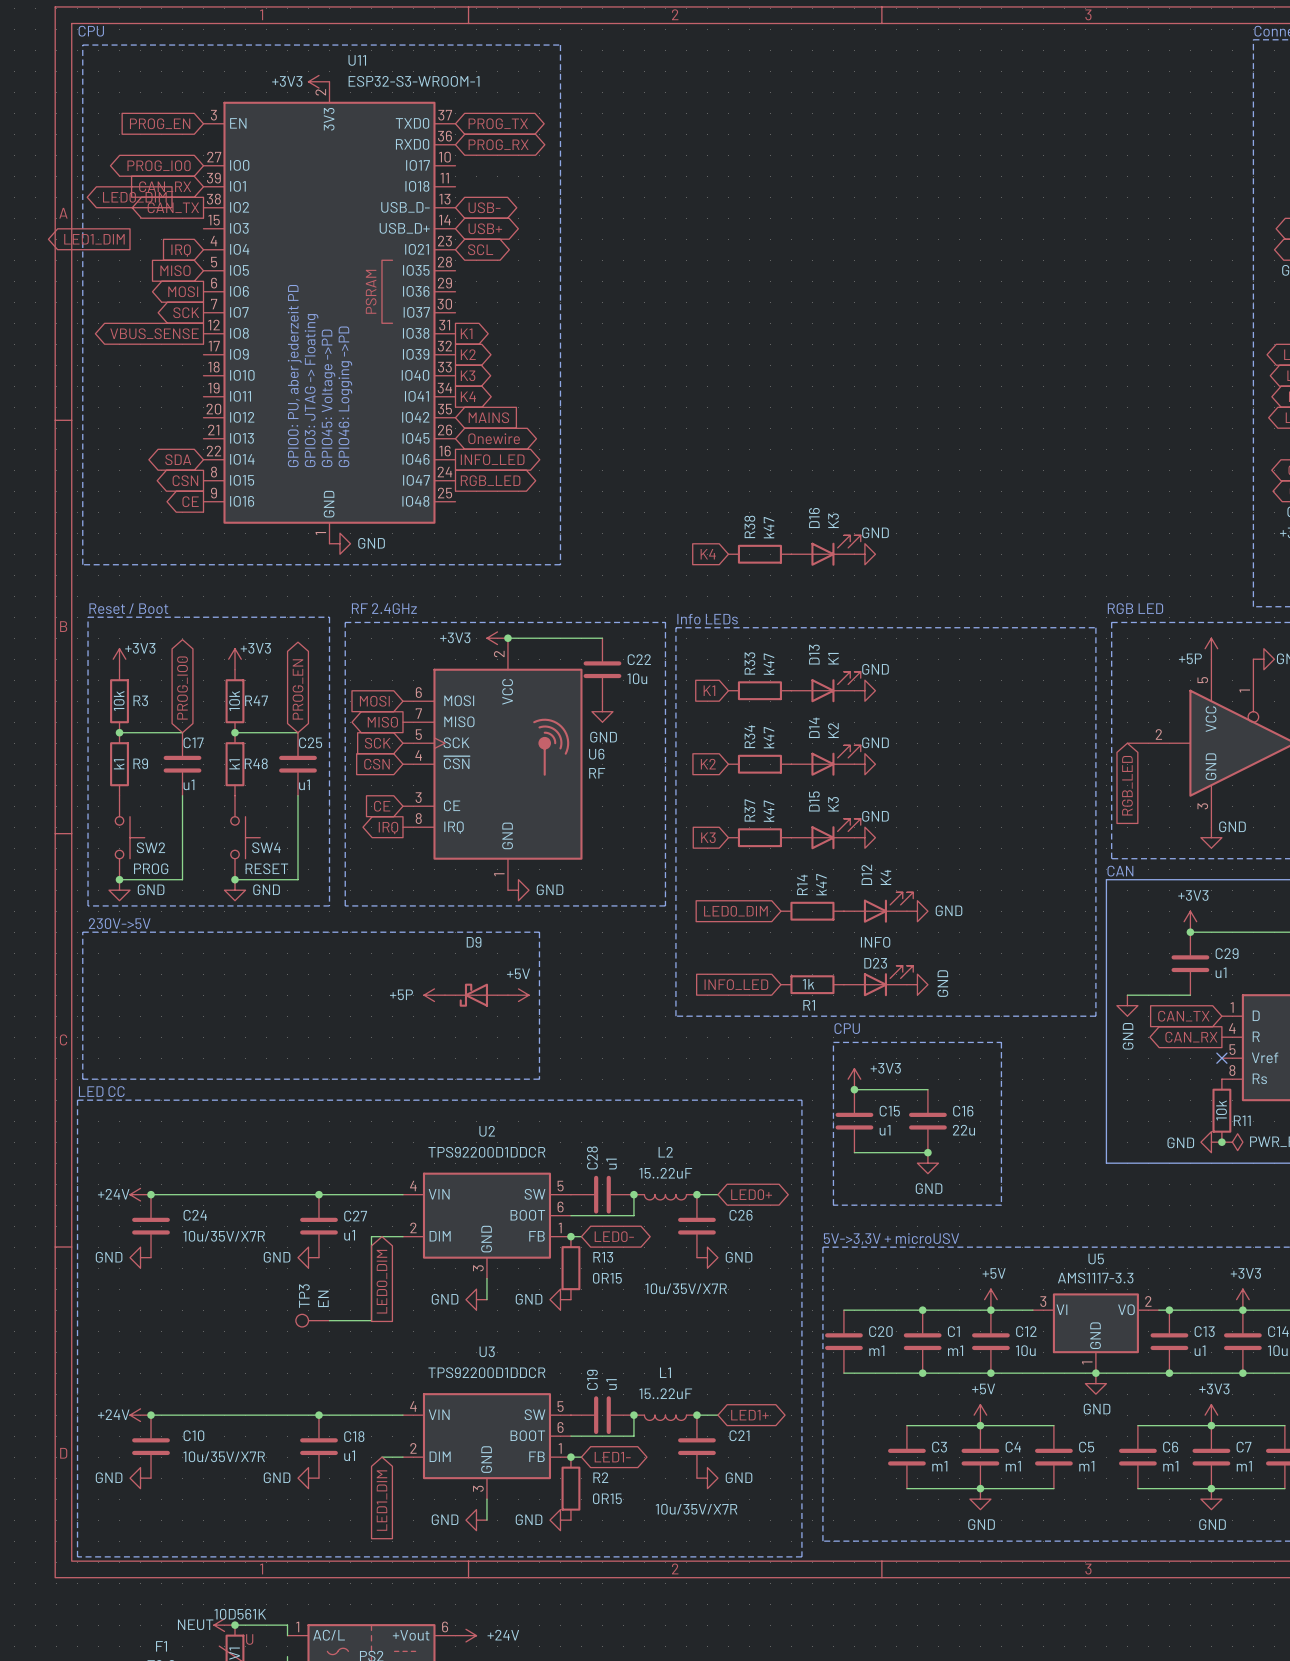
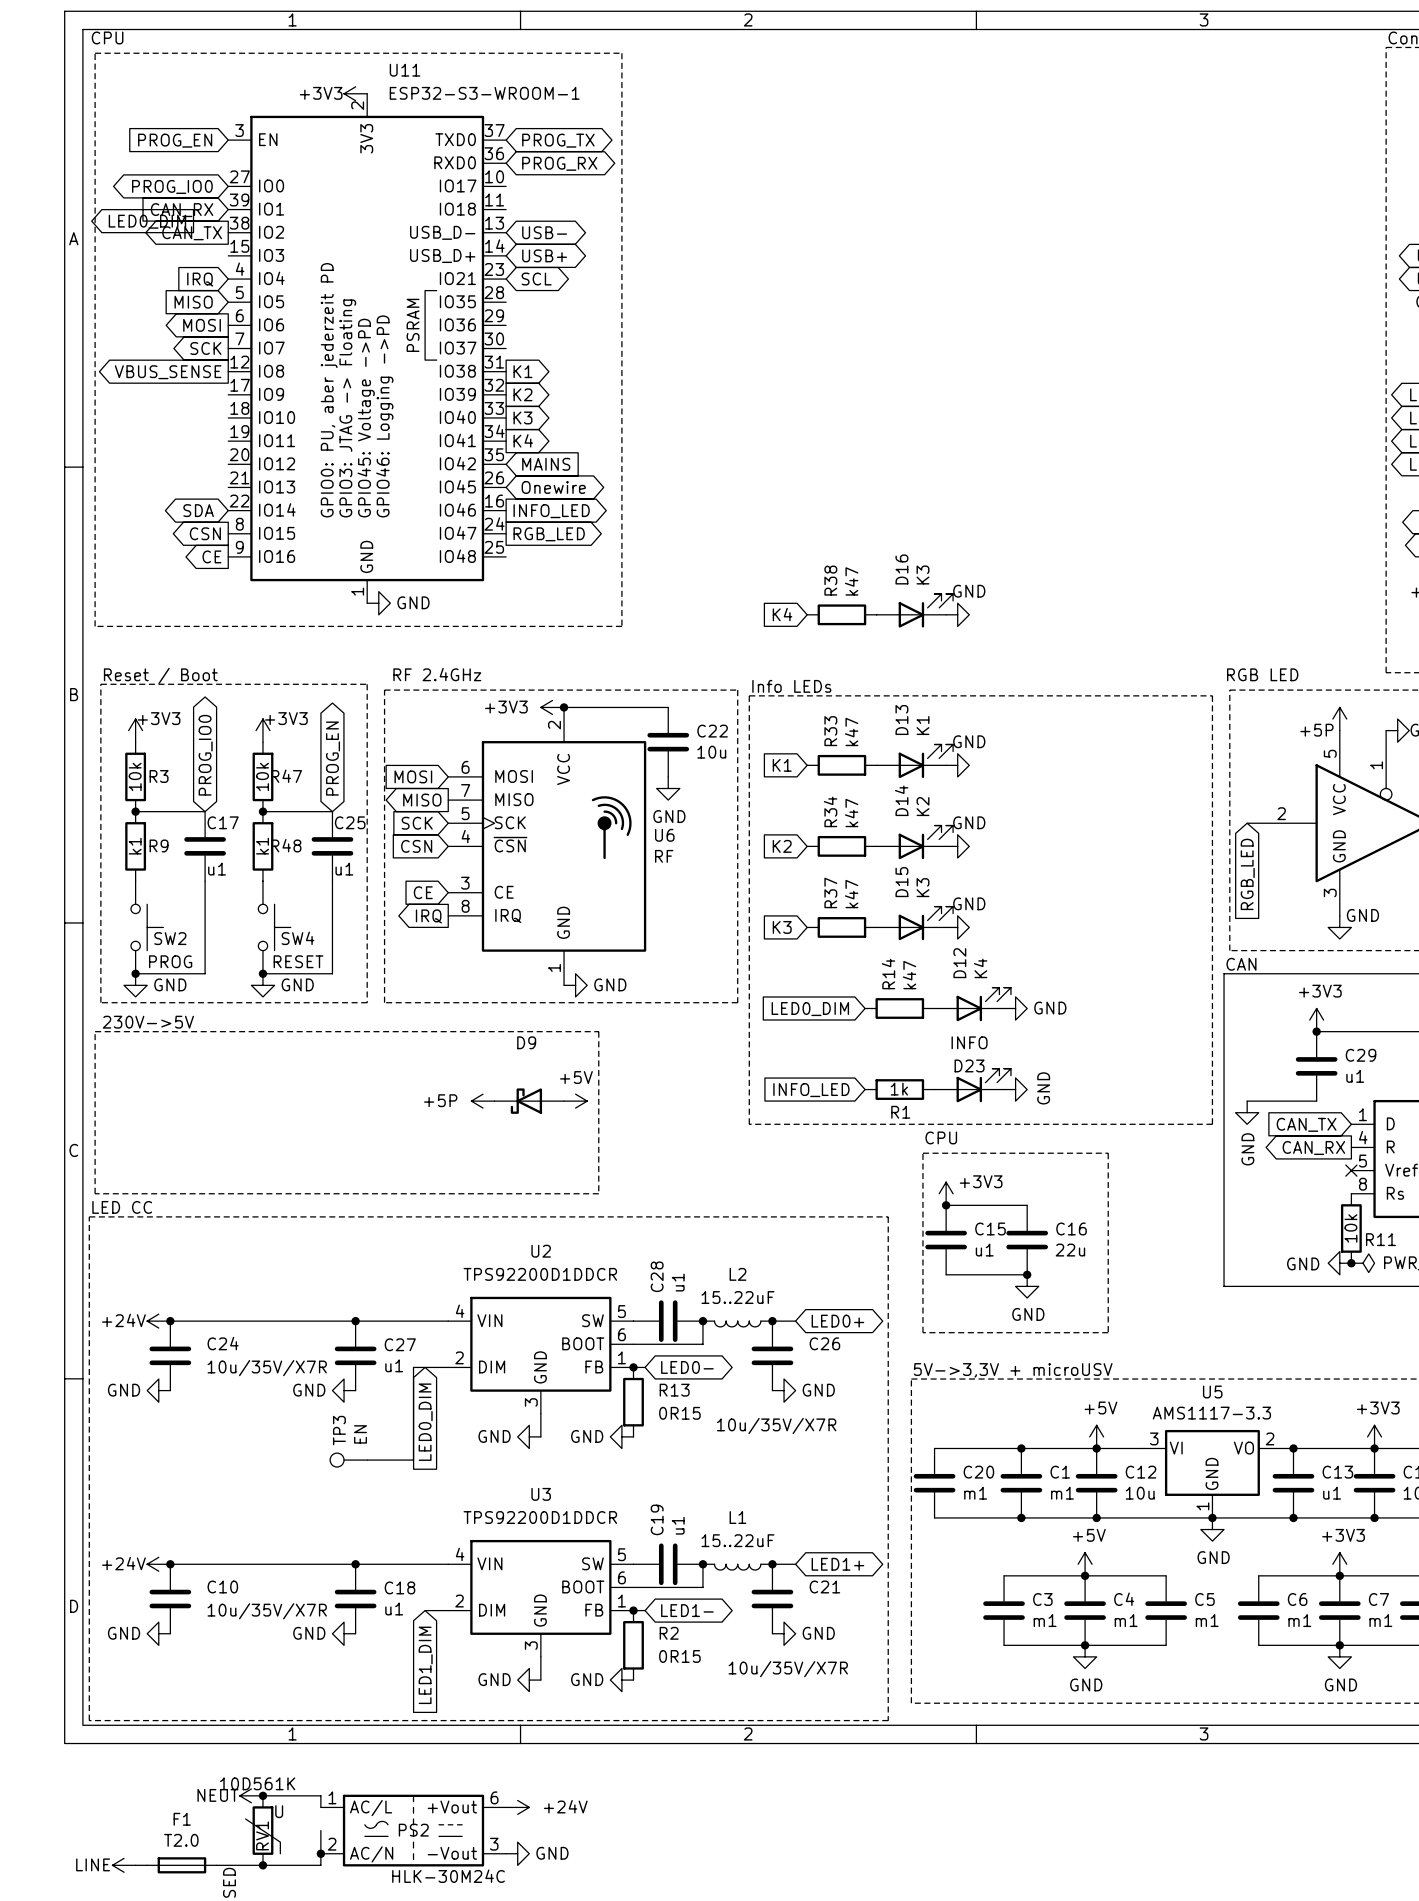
global label: LED1_DIM (94, 239) -> none

